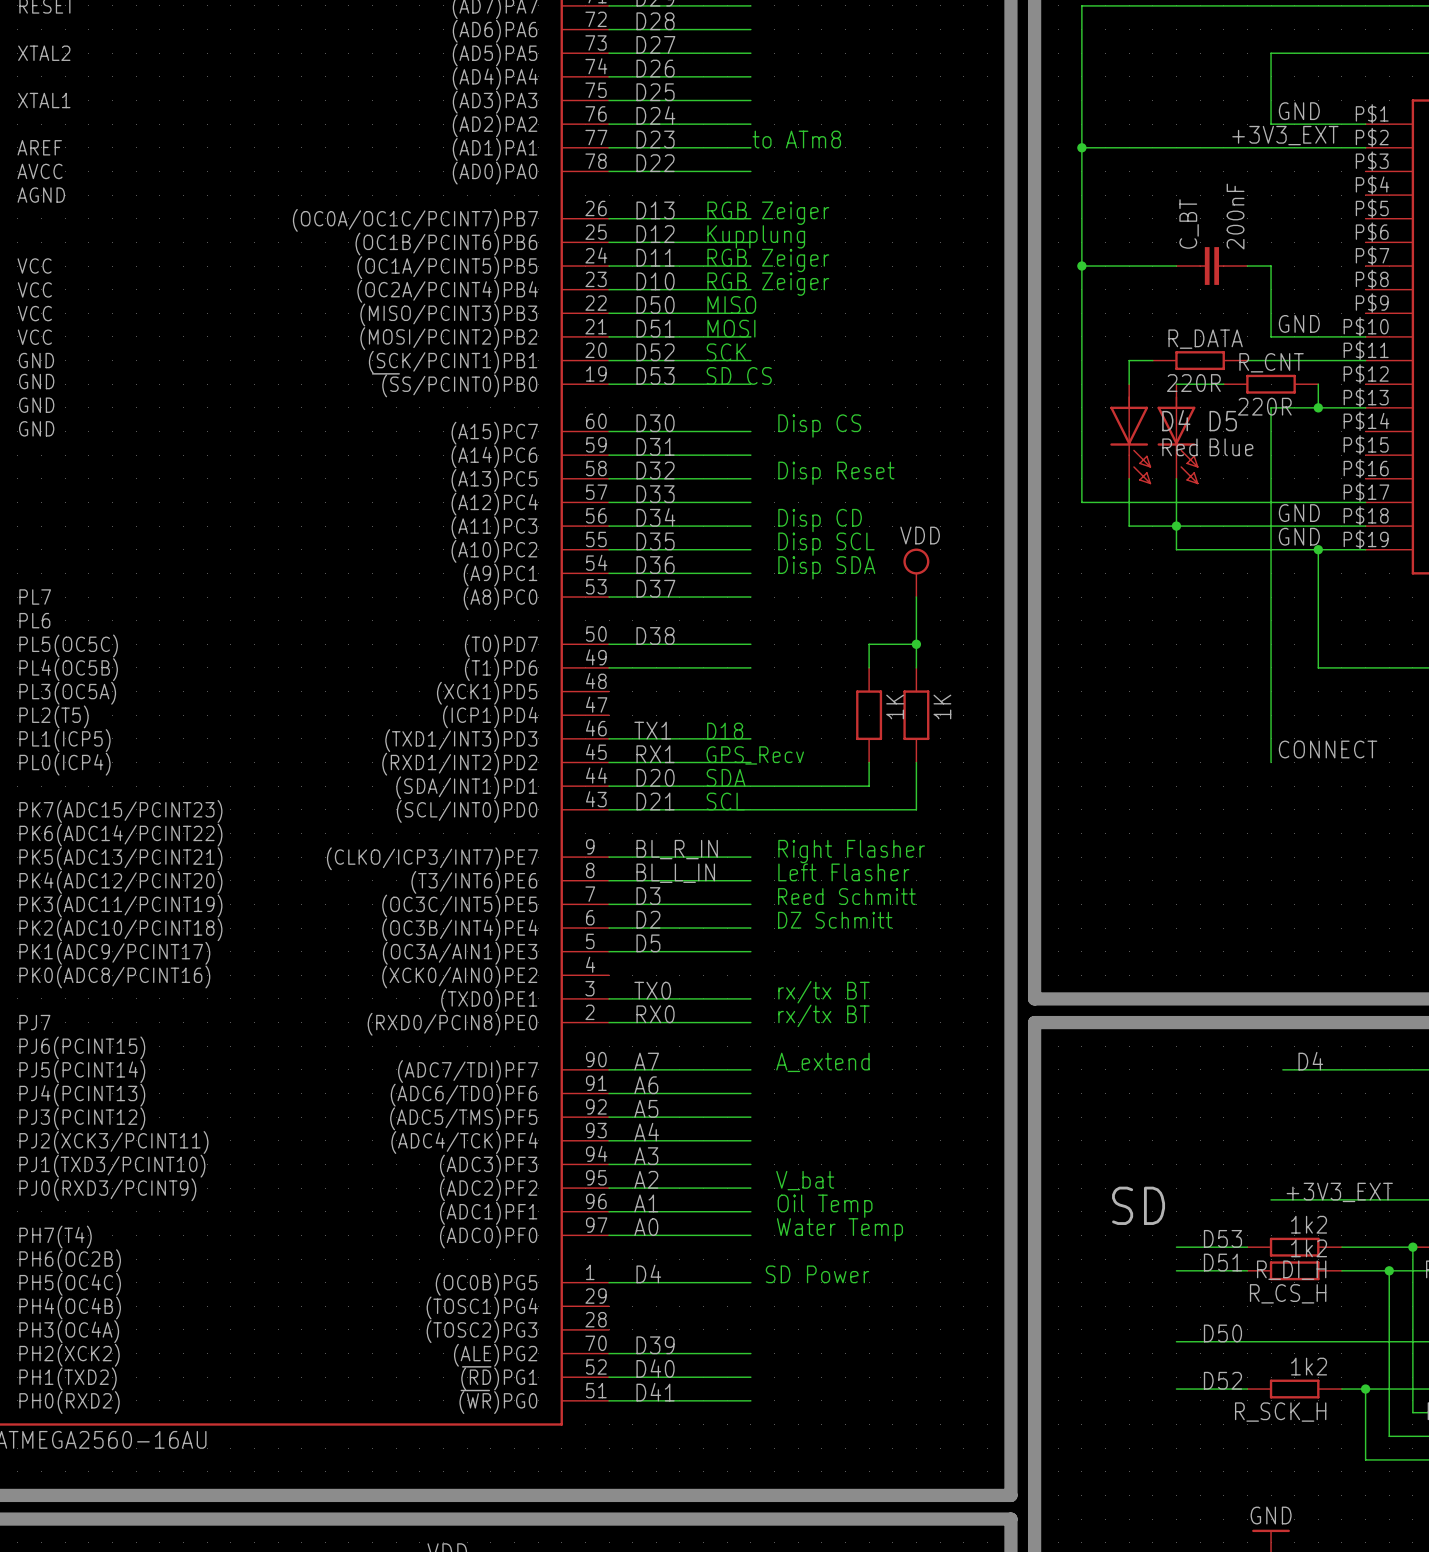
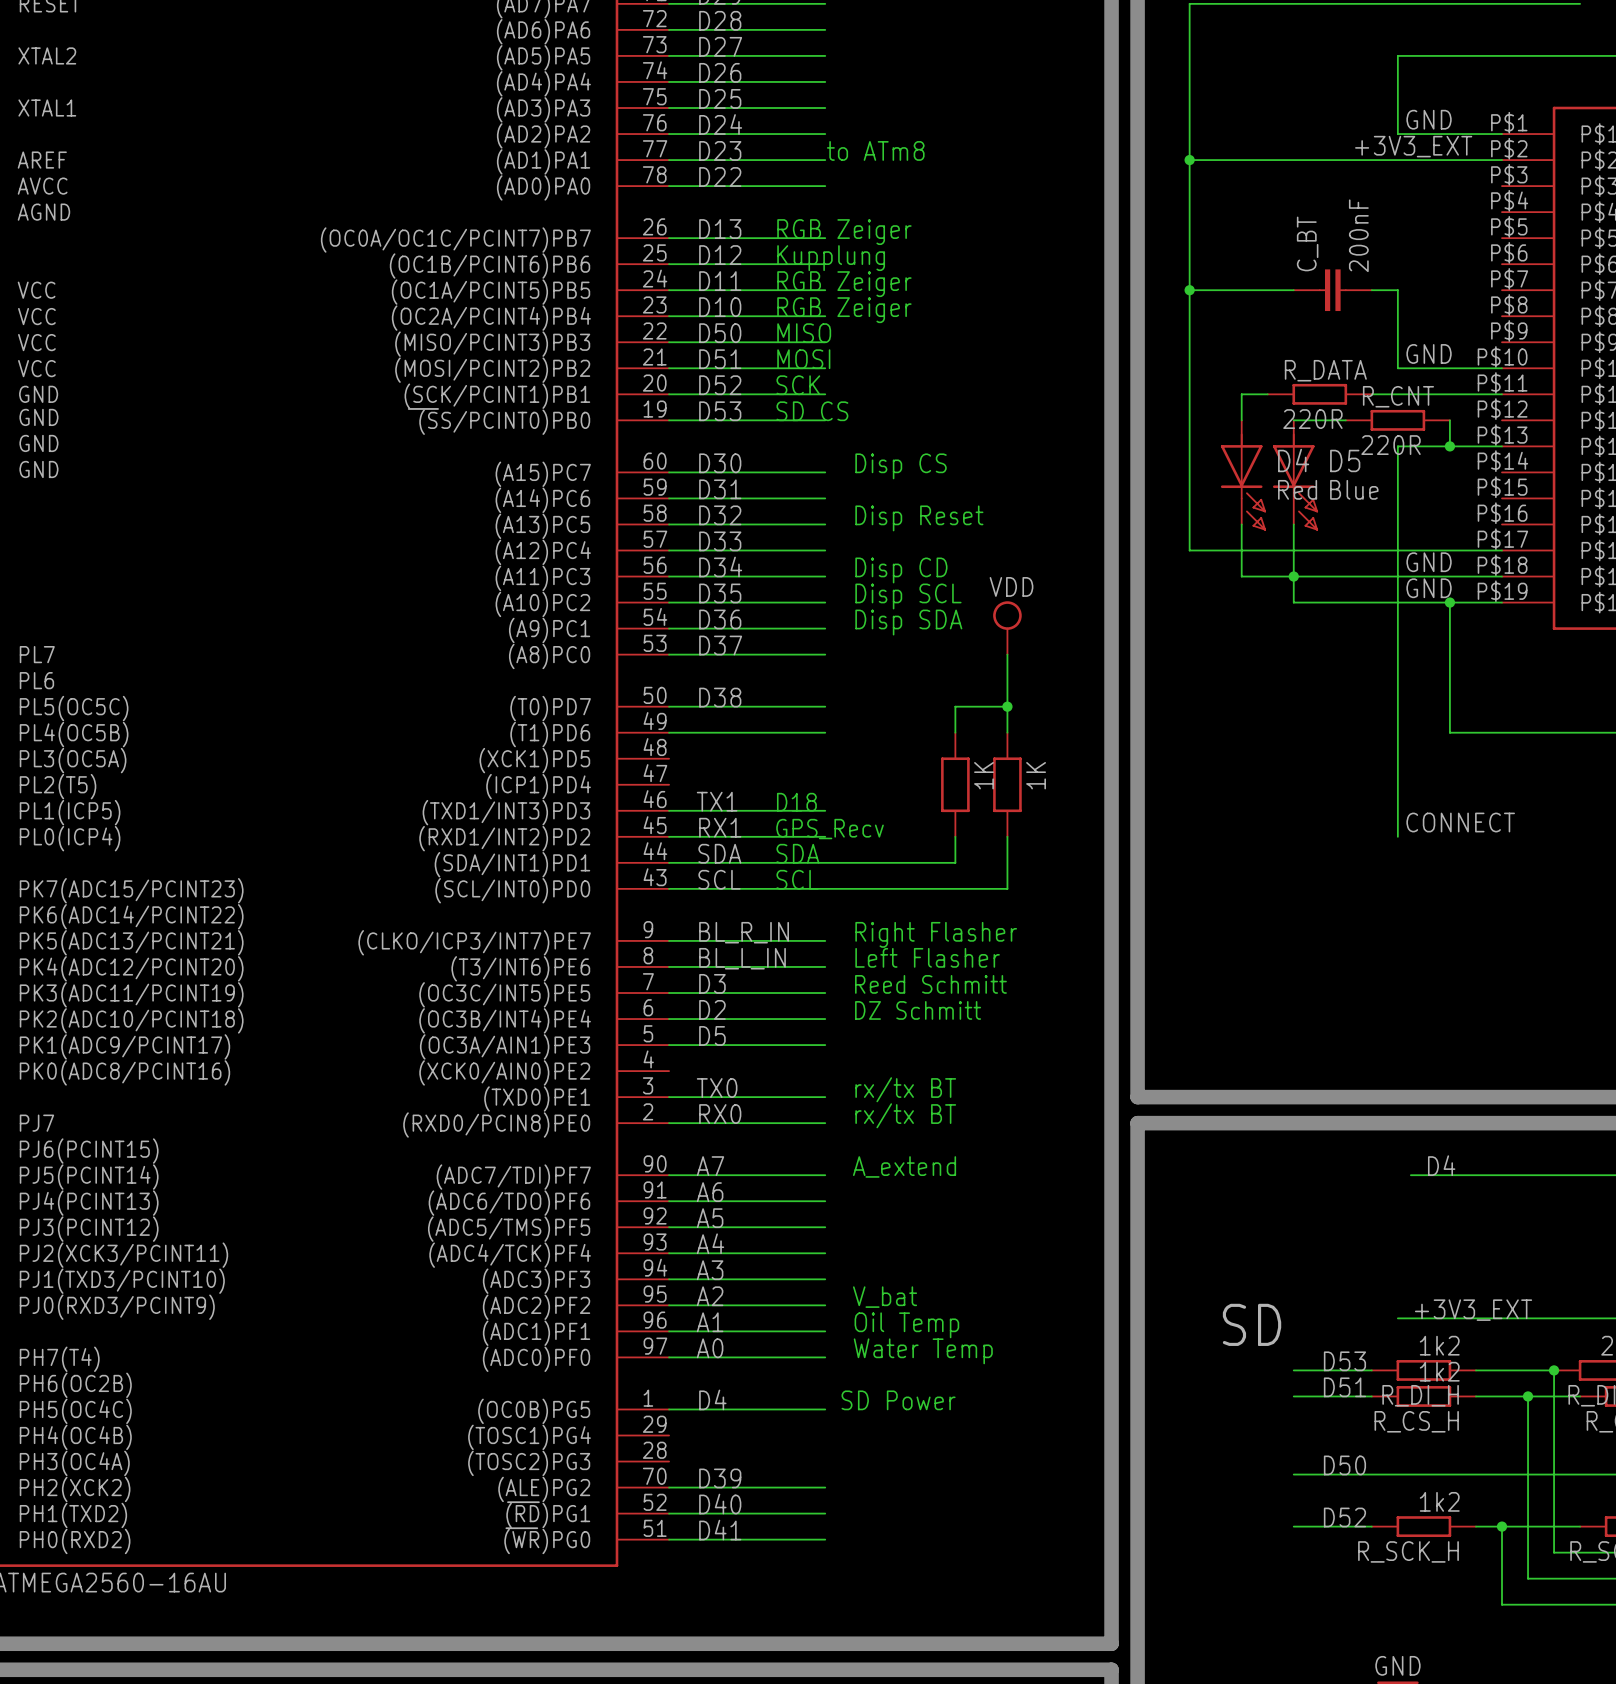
label: D20 (655, 777) -> SDA (719, 853)
label: D21 (655, 801) -> SCL (719, 879)

